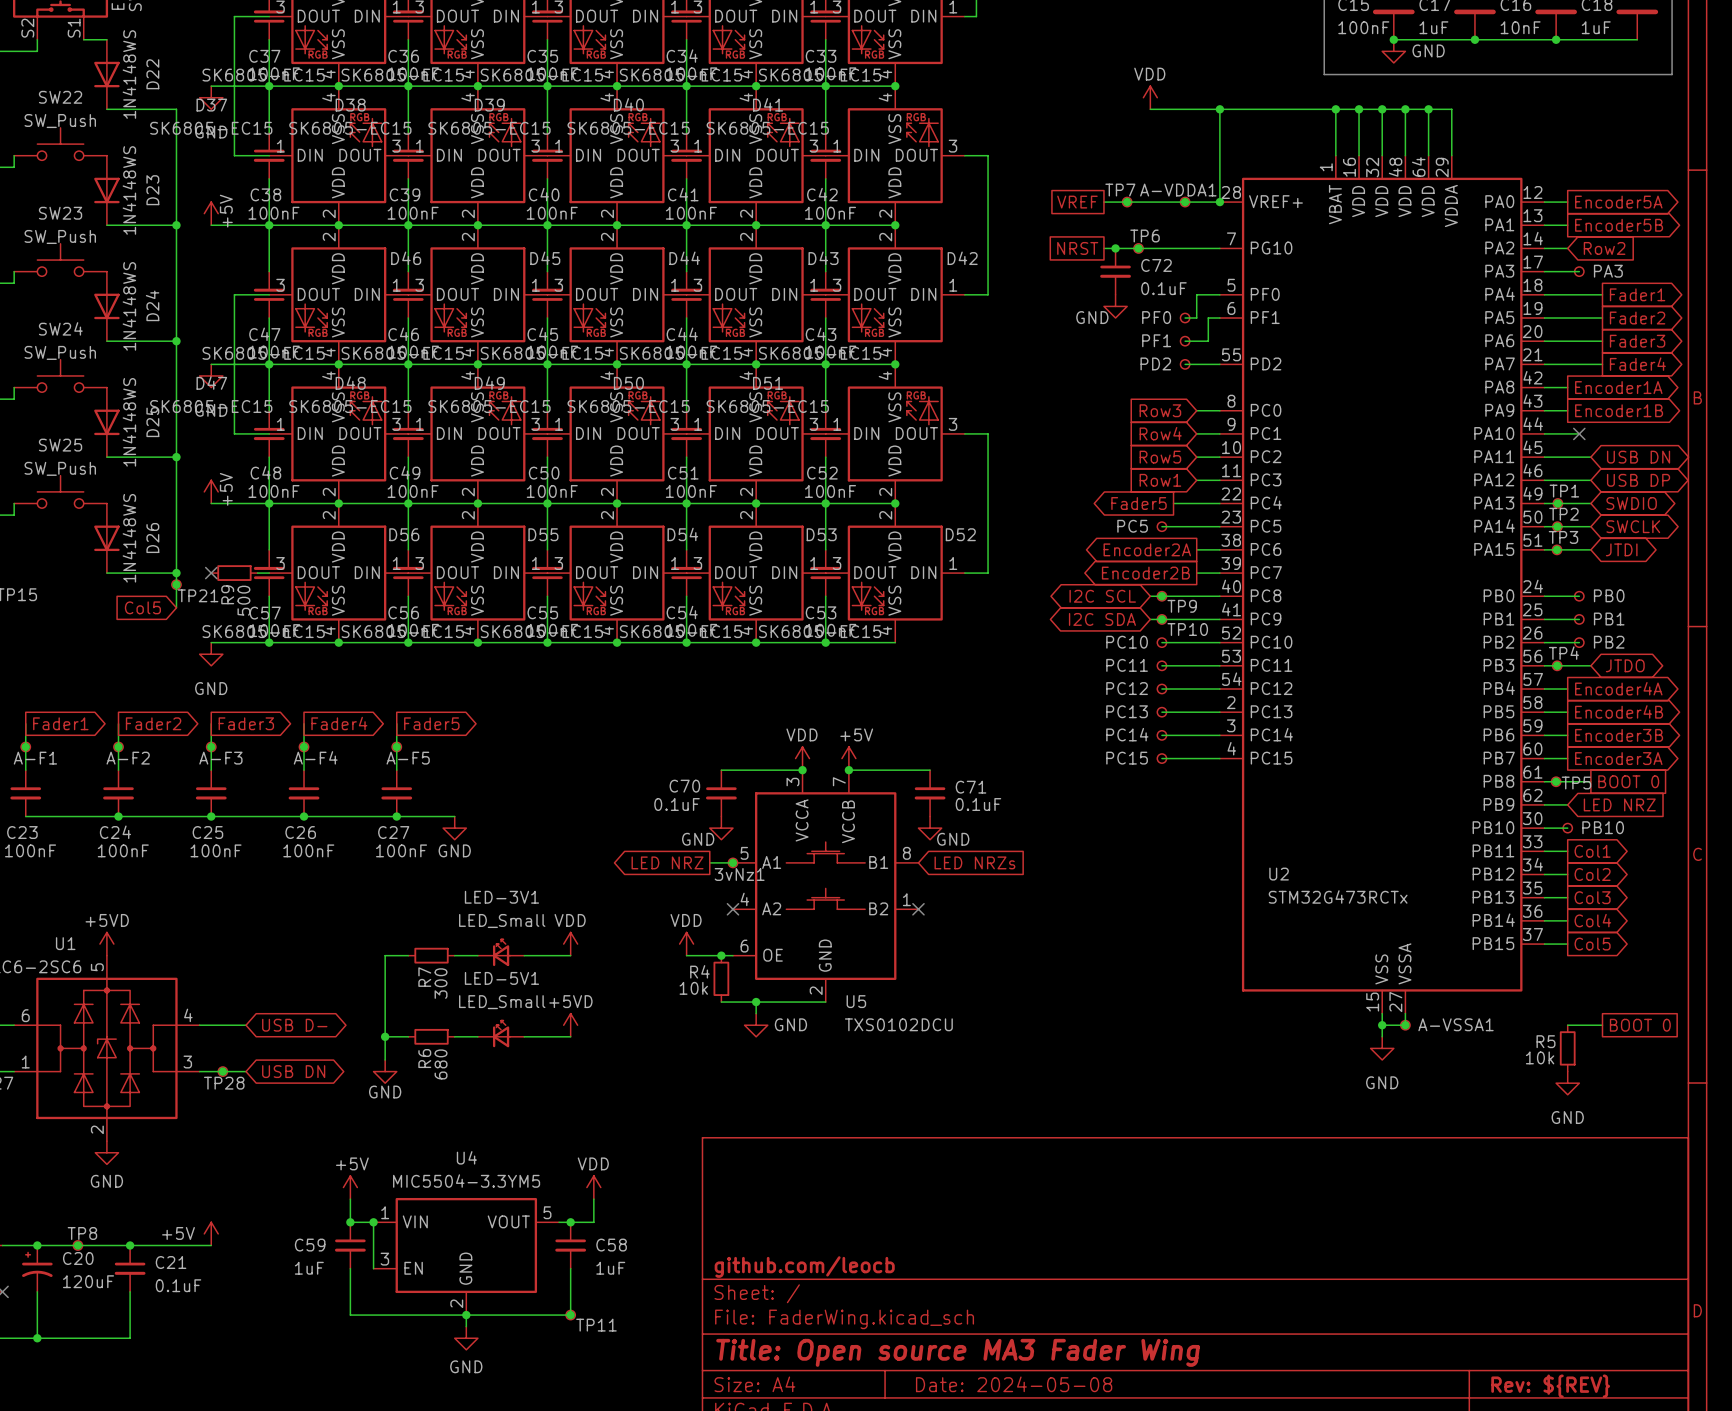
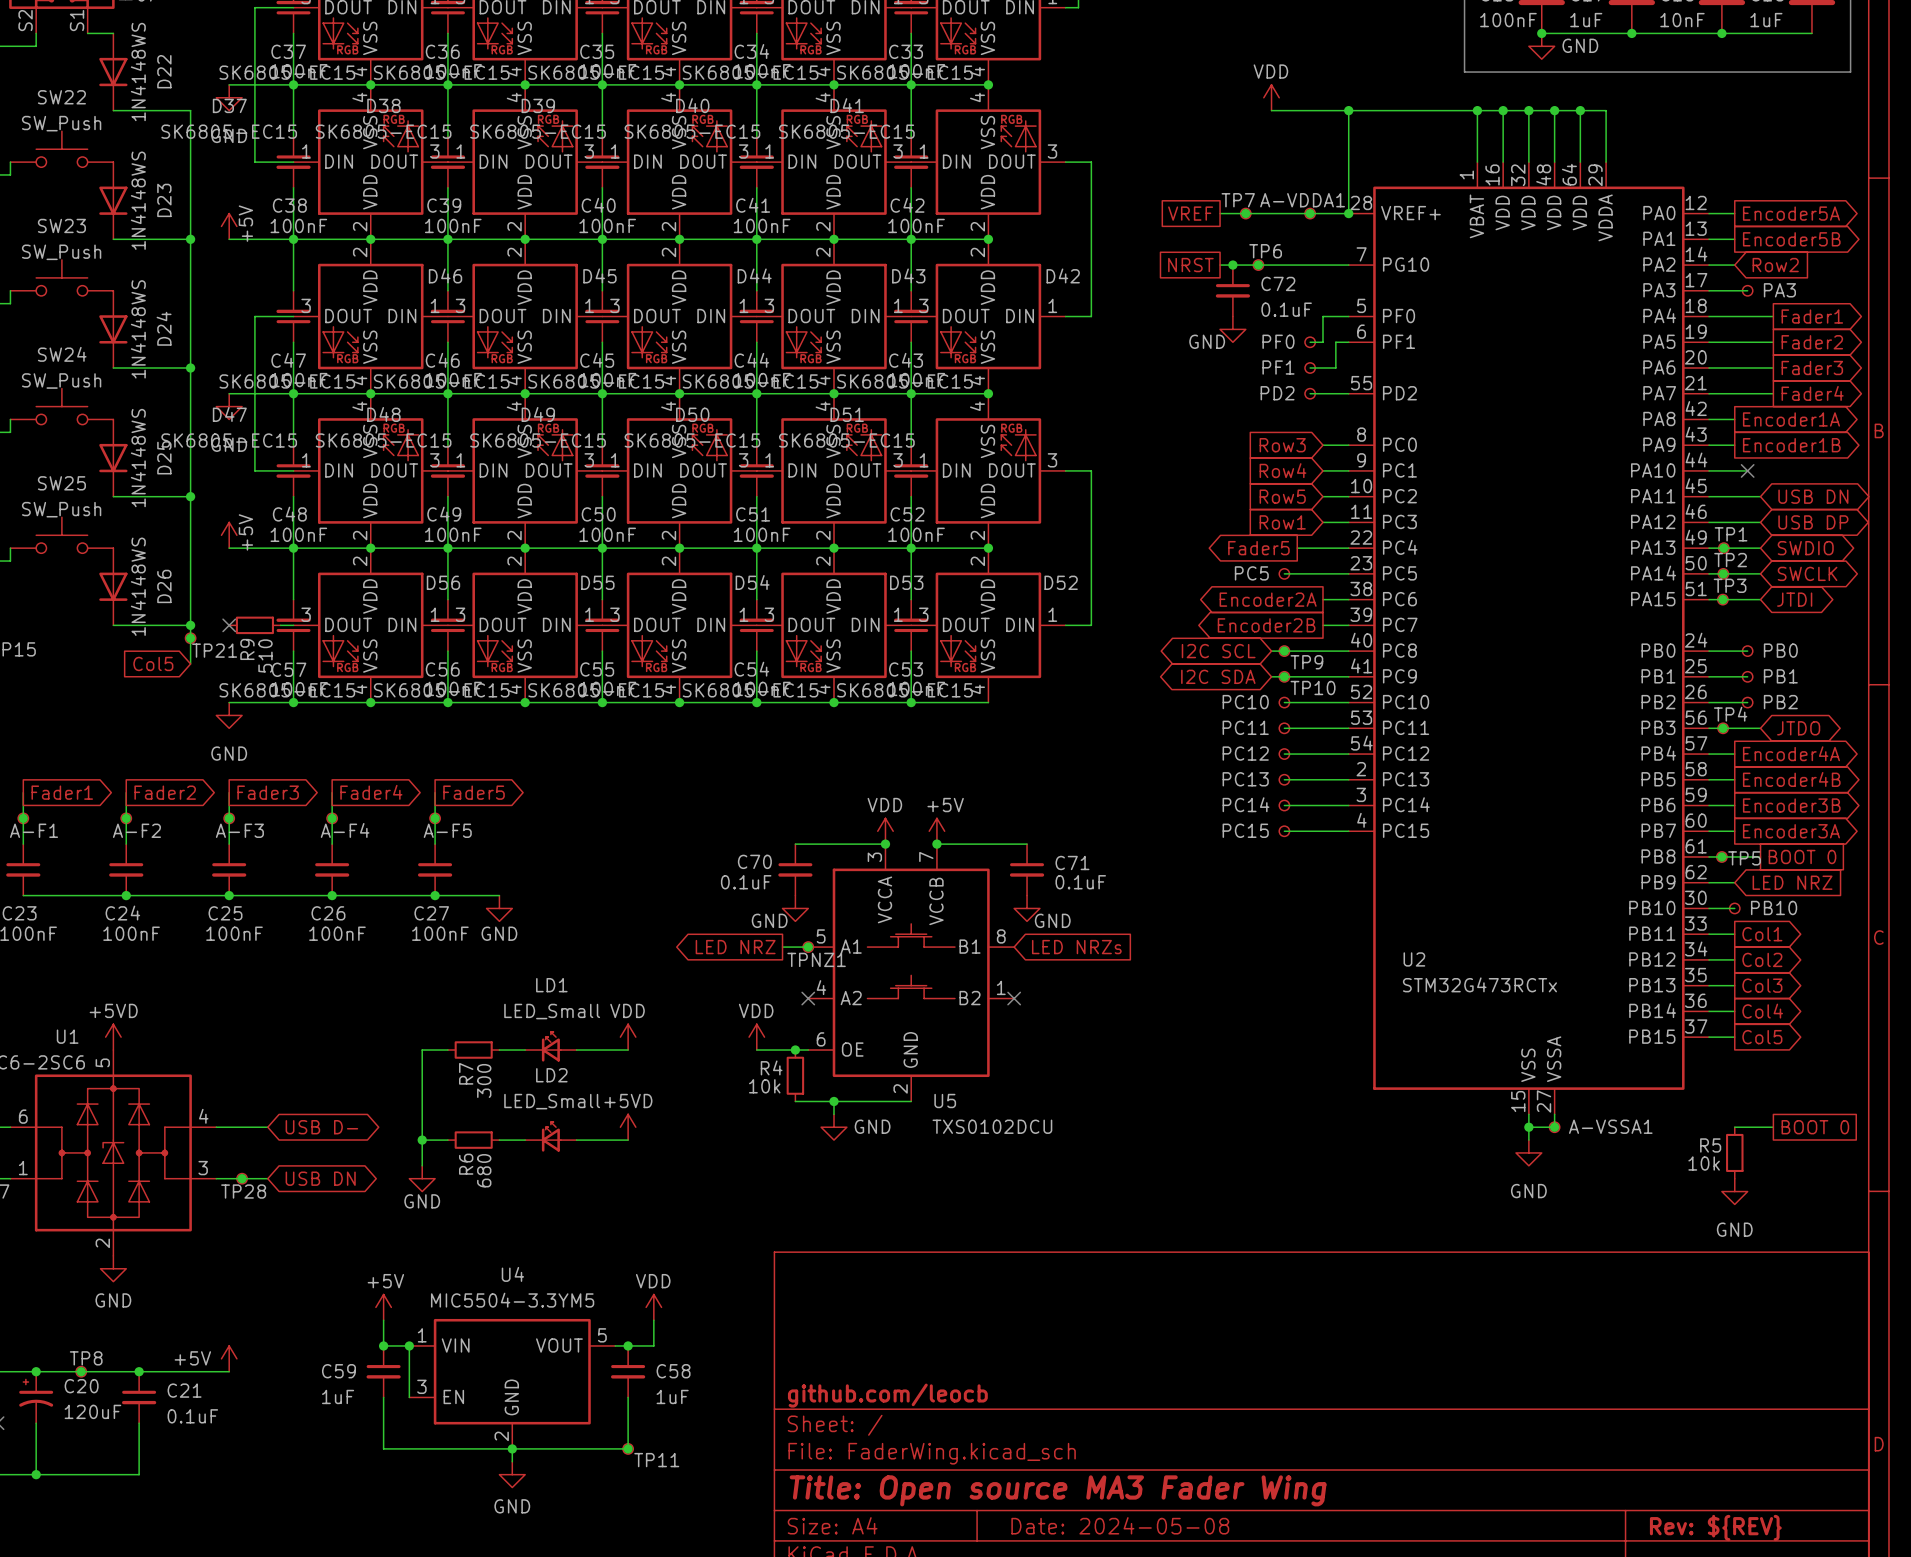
R9 value: 500 (243, 600) -> 510 (265, 656)
3vNz1 name: 3vNz1 (739, 874) -> TPNZ1 (816, 959)
LED-3V1 name: LED-3V1 (501, 897) -> LD1 (551, 985)
LED-5V1 name: LED-5V1 (501, 978) -> LD2 (551, 1075)

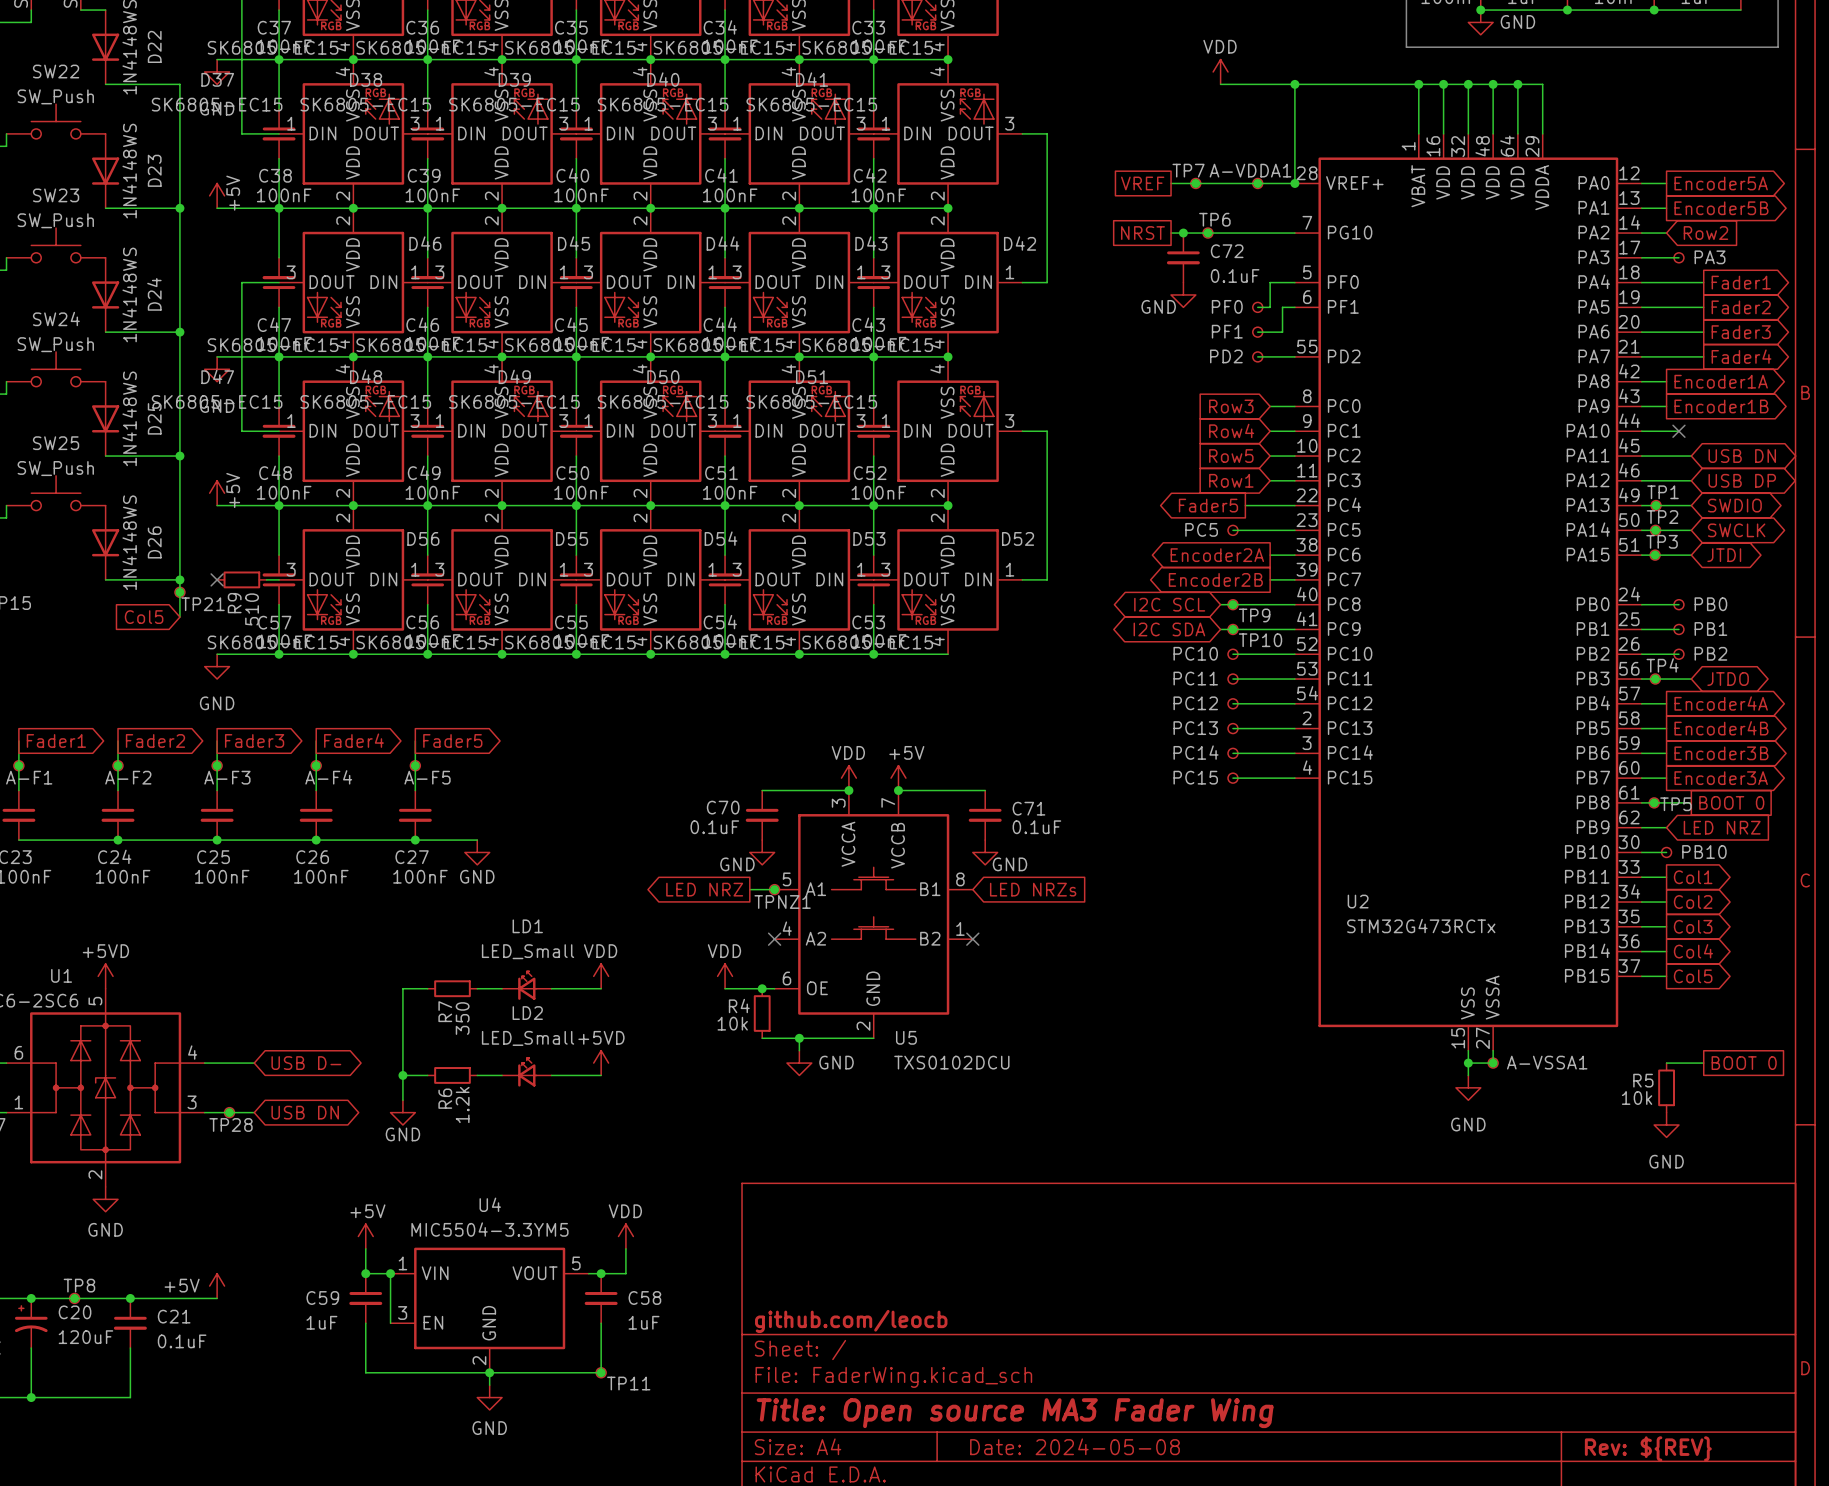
R7 value: 300 (484, 1080) -> 350 (462, 1018)
R6 value: 680 (484, 1170) -> 1.2k (462, 1104)

